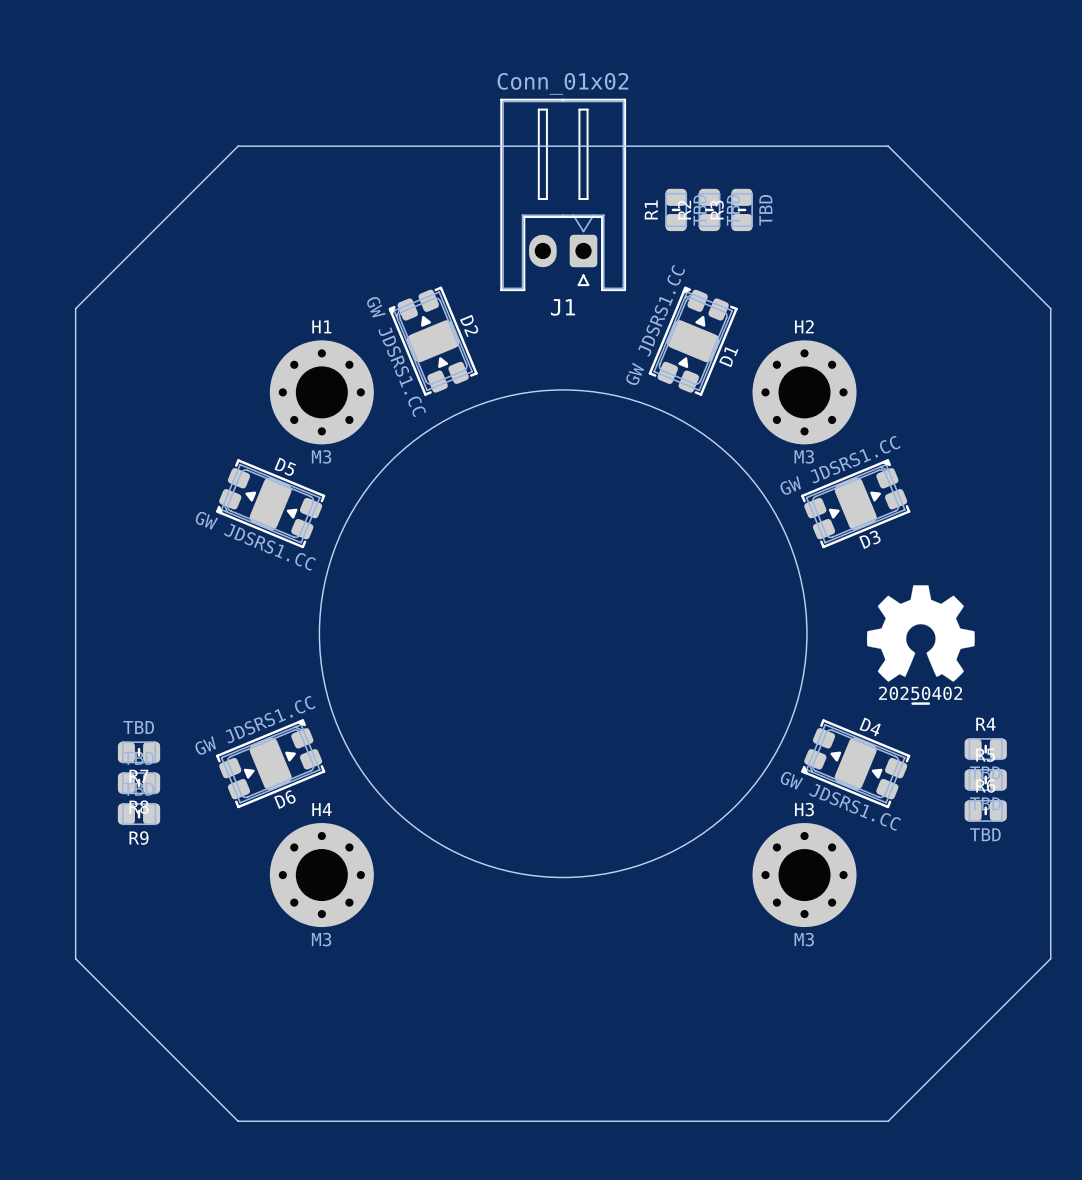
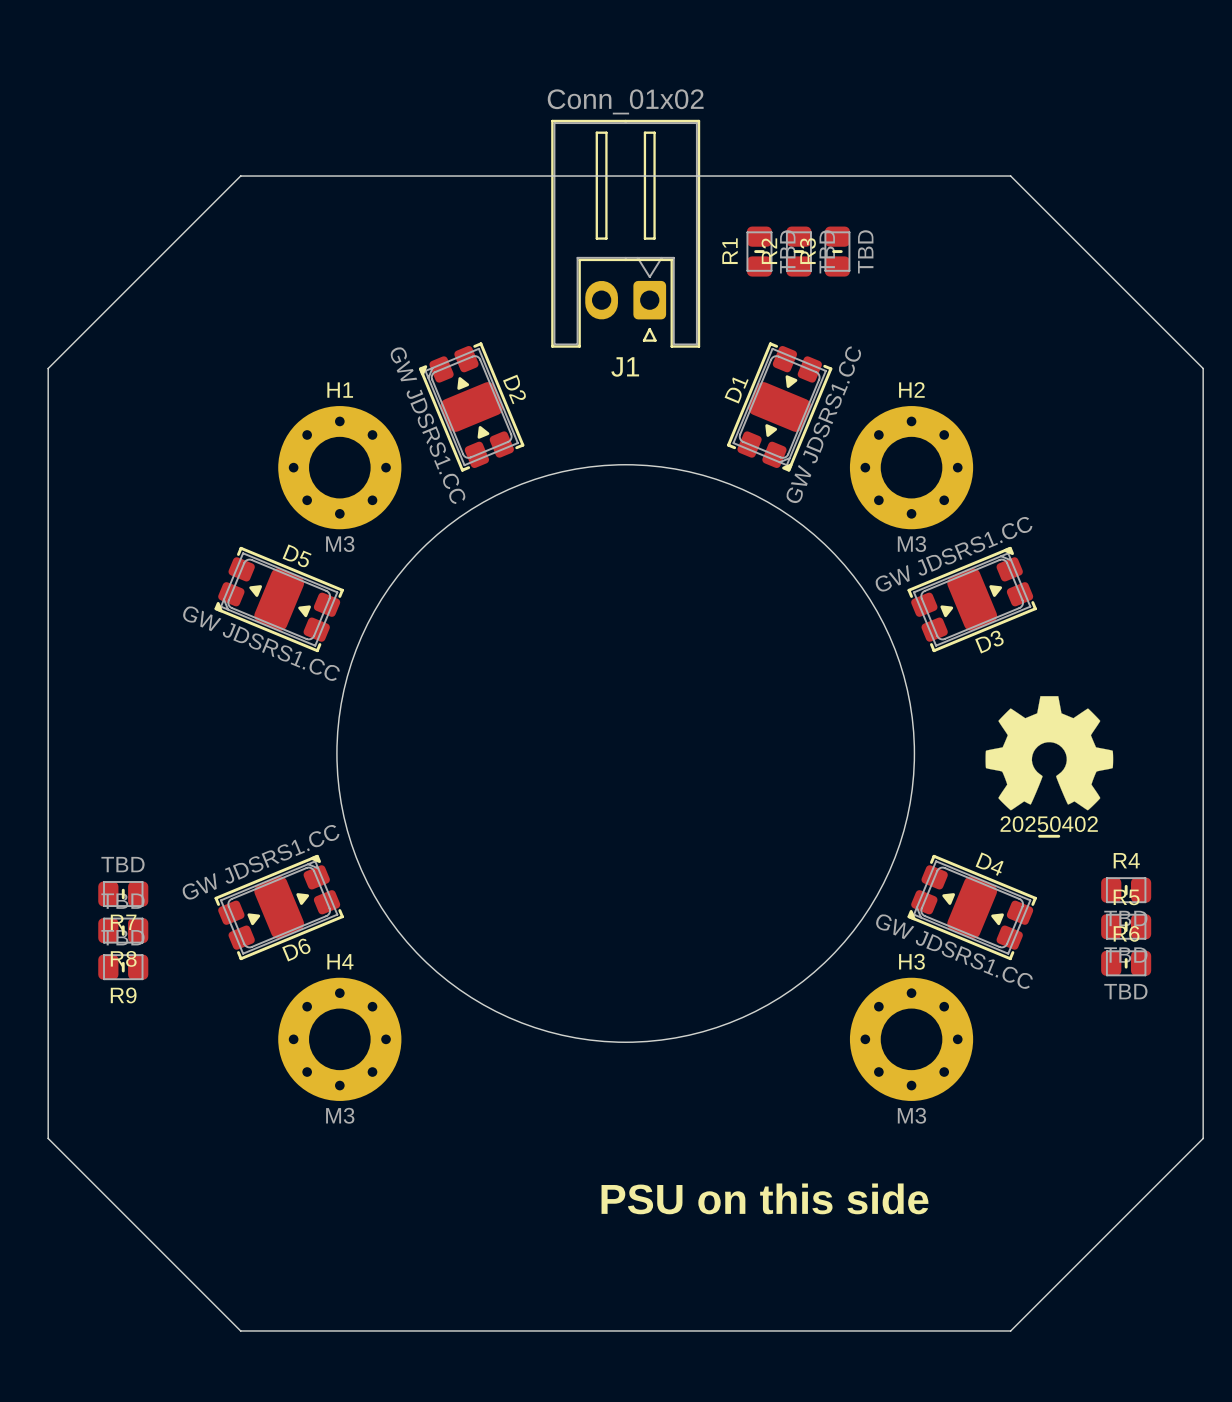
D1 rotation: 0° (693, 341) -> 180° (779, 407)
text: none -> PSU on this side (764, 1198)

